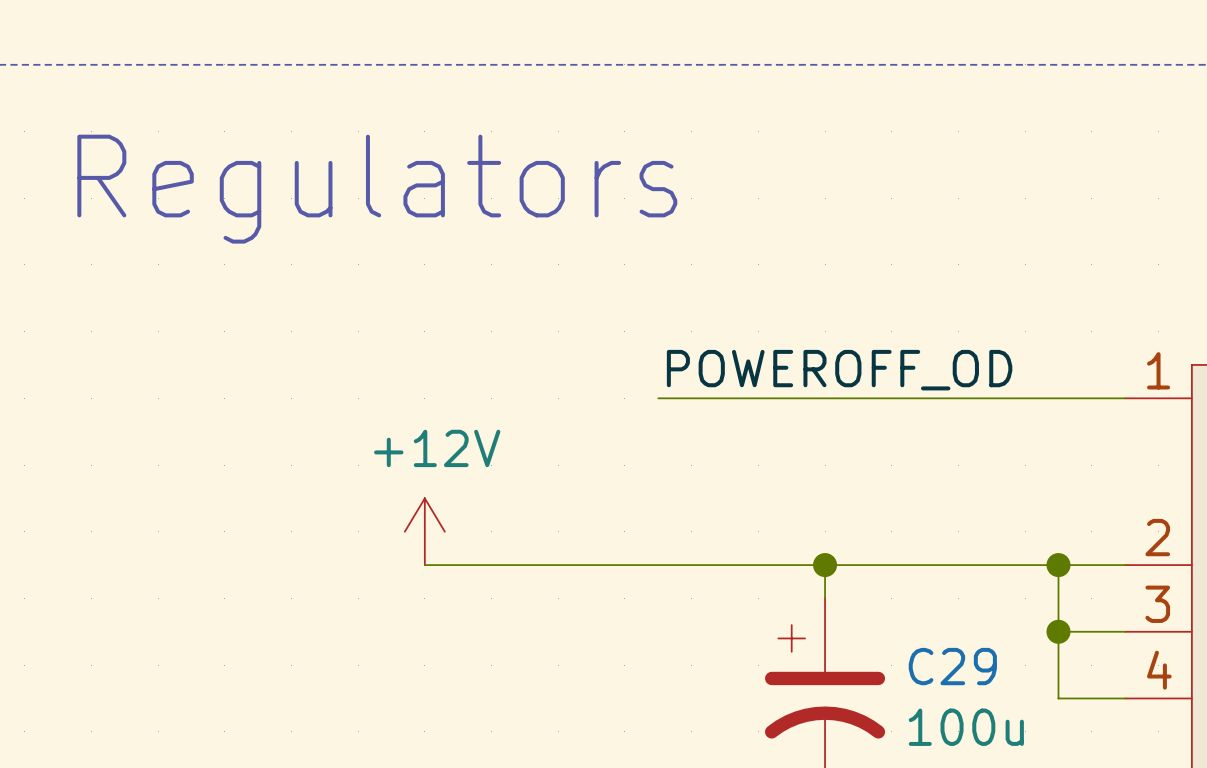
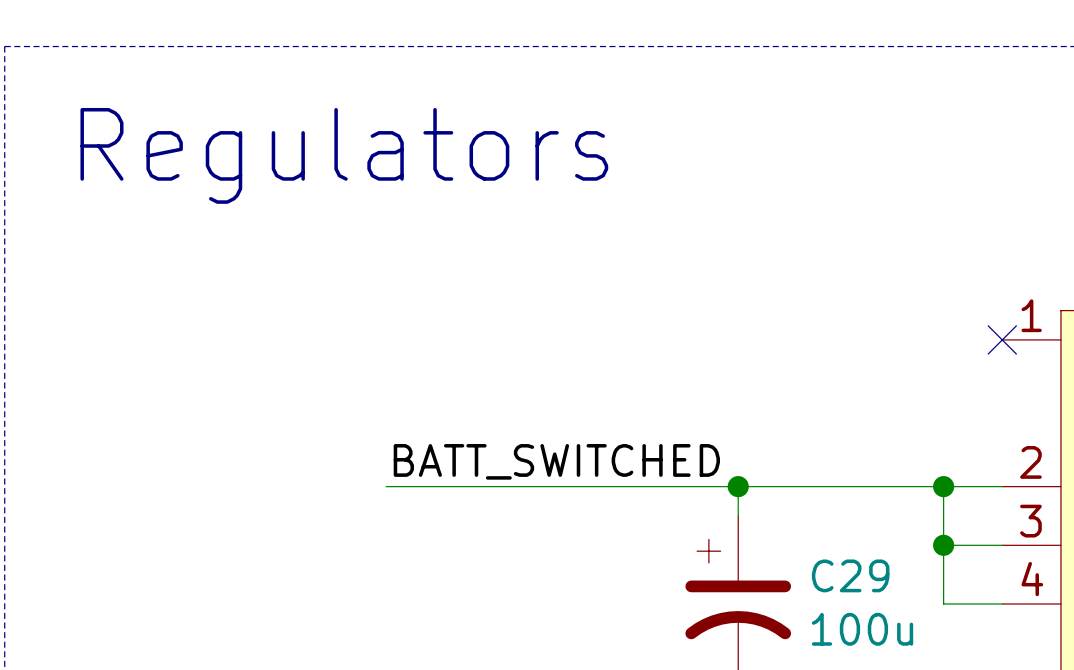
label: POWEROFF_OD (839, 370) -> none
wire: (658, 398) (1125, 398) -> none
no-connect mark: none -> (1002, 339)
power symbol: +12V (424, 531) -> none
label: none -> BATT_SWITCHED (556, 461)

